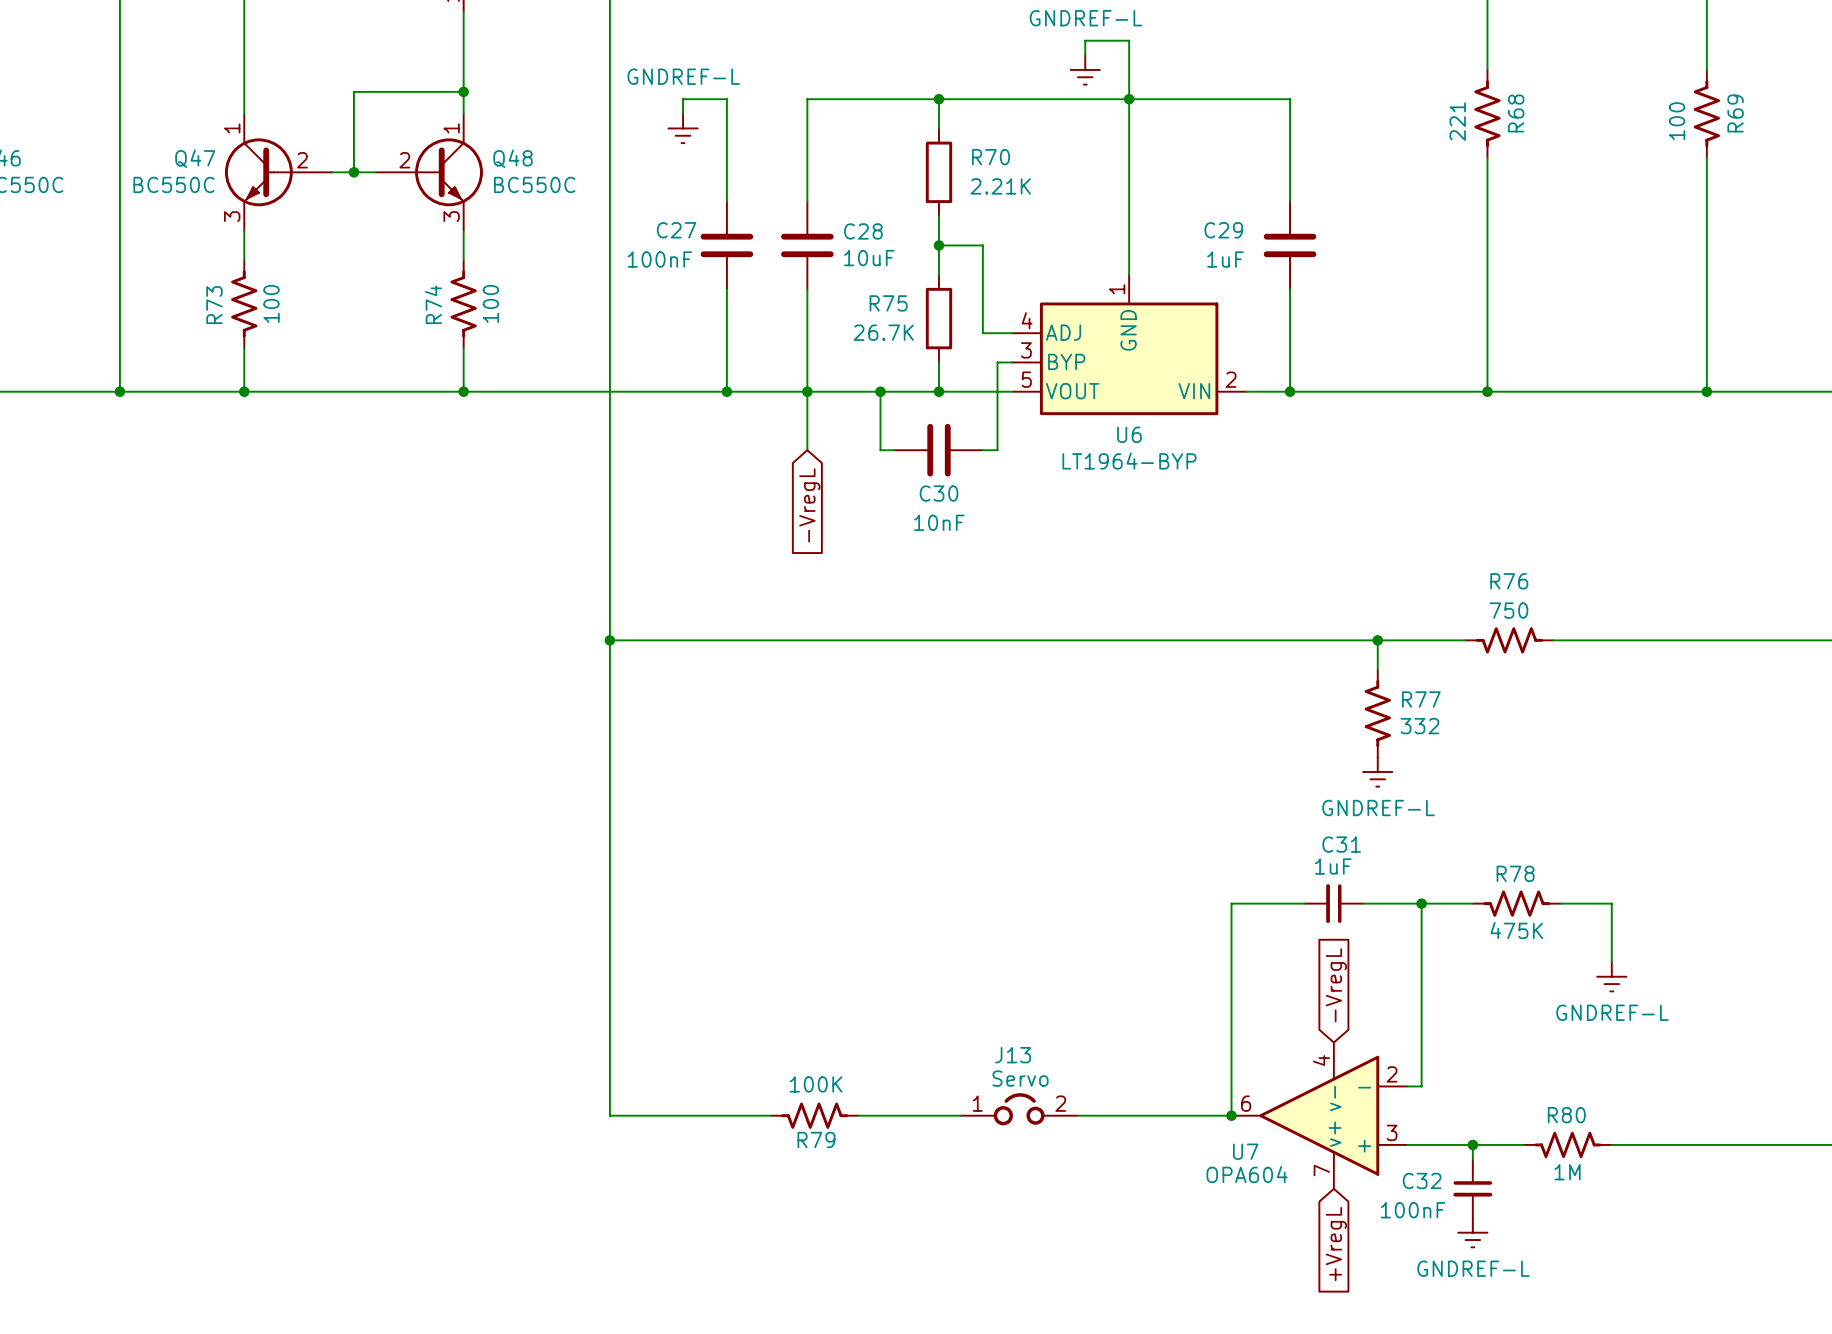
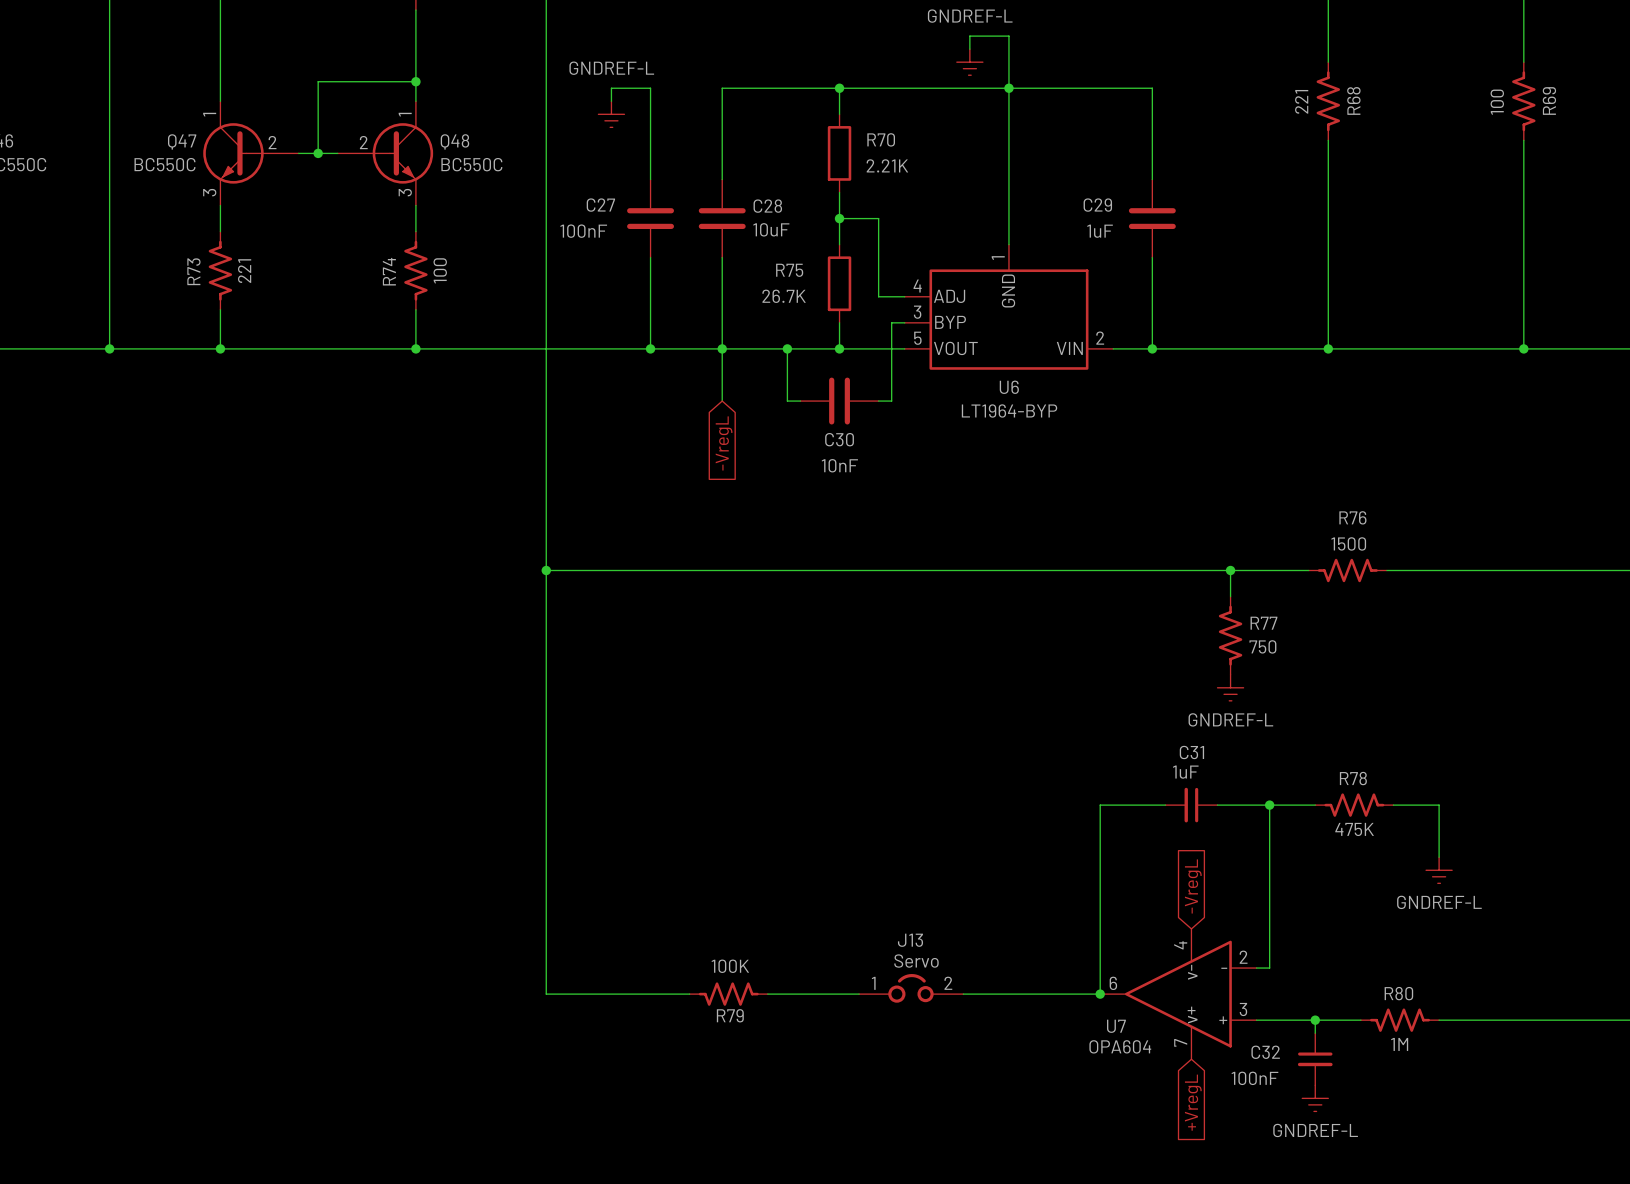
R73 value: 100 (271, 303) -> 221 (244, 271)
R76 value: 750 (1508, 610) -> 1500 (1348, 543)
R77 value: 332 (1419, 726) -> 750 (1262, 646)

